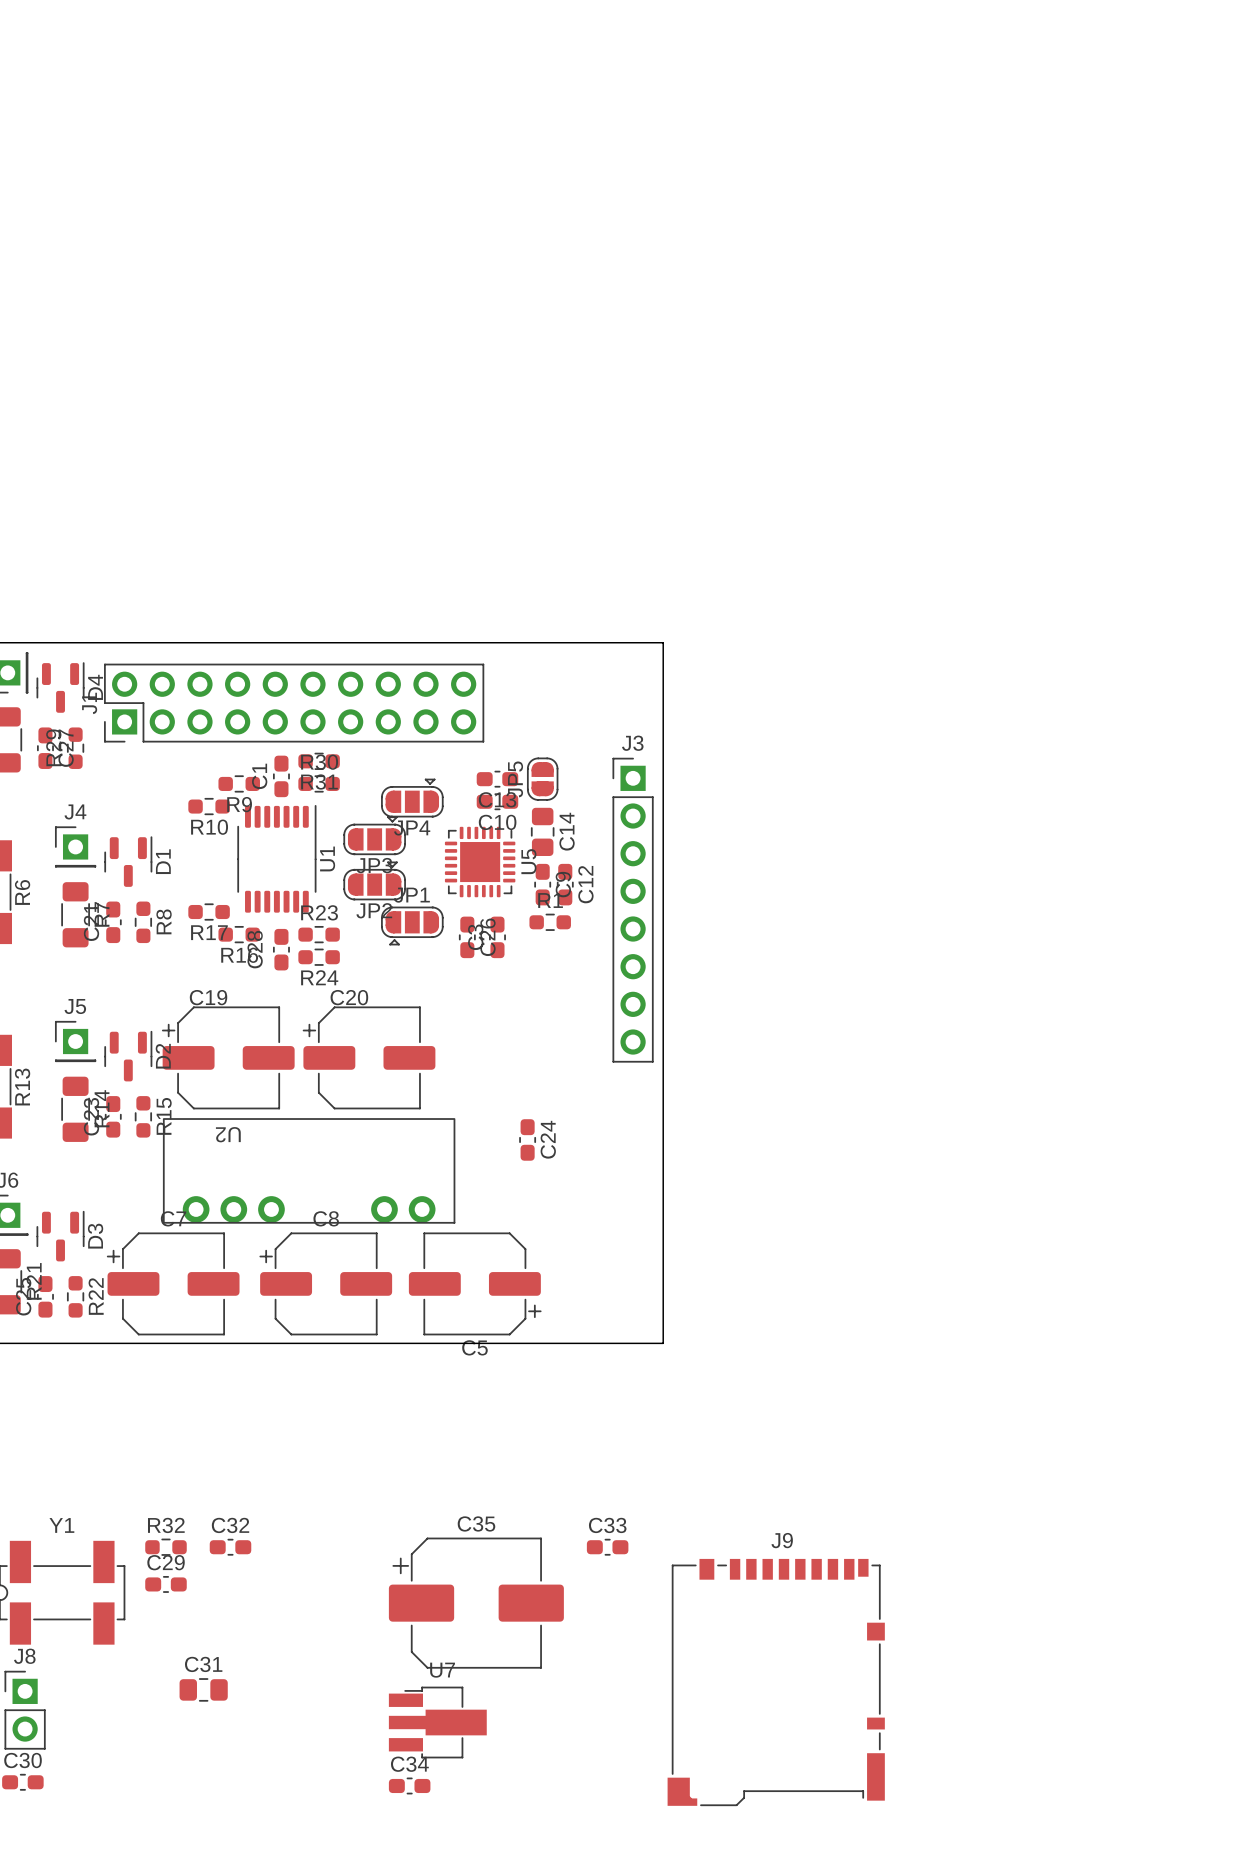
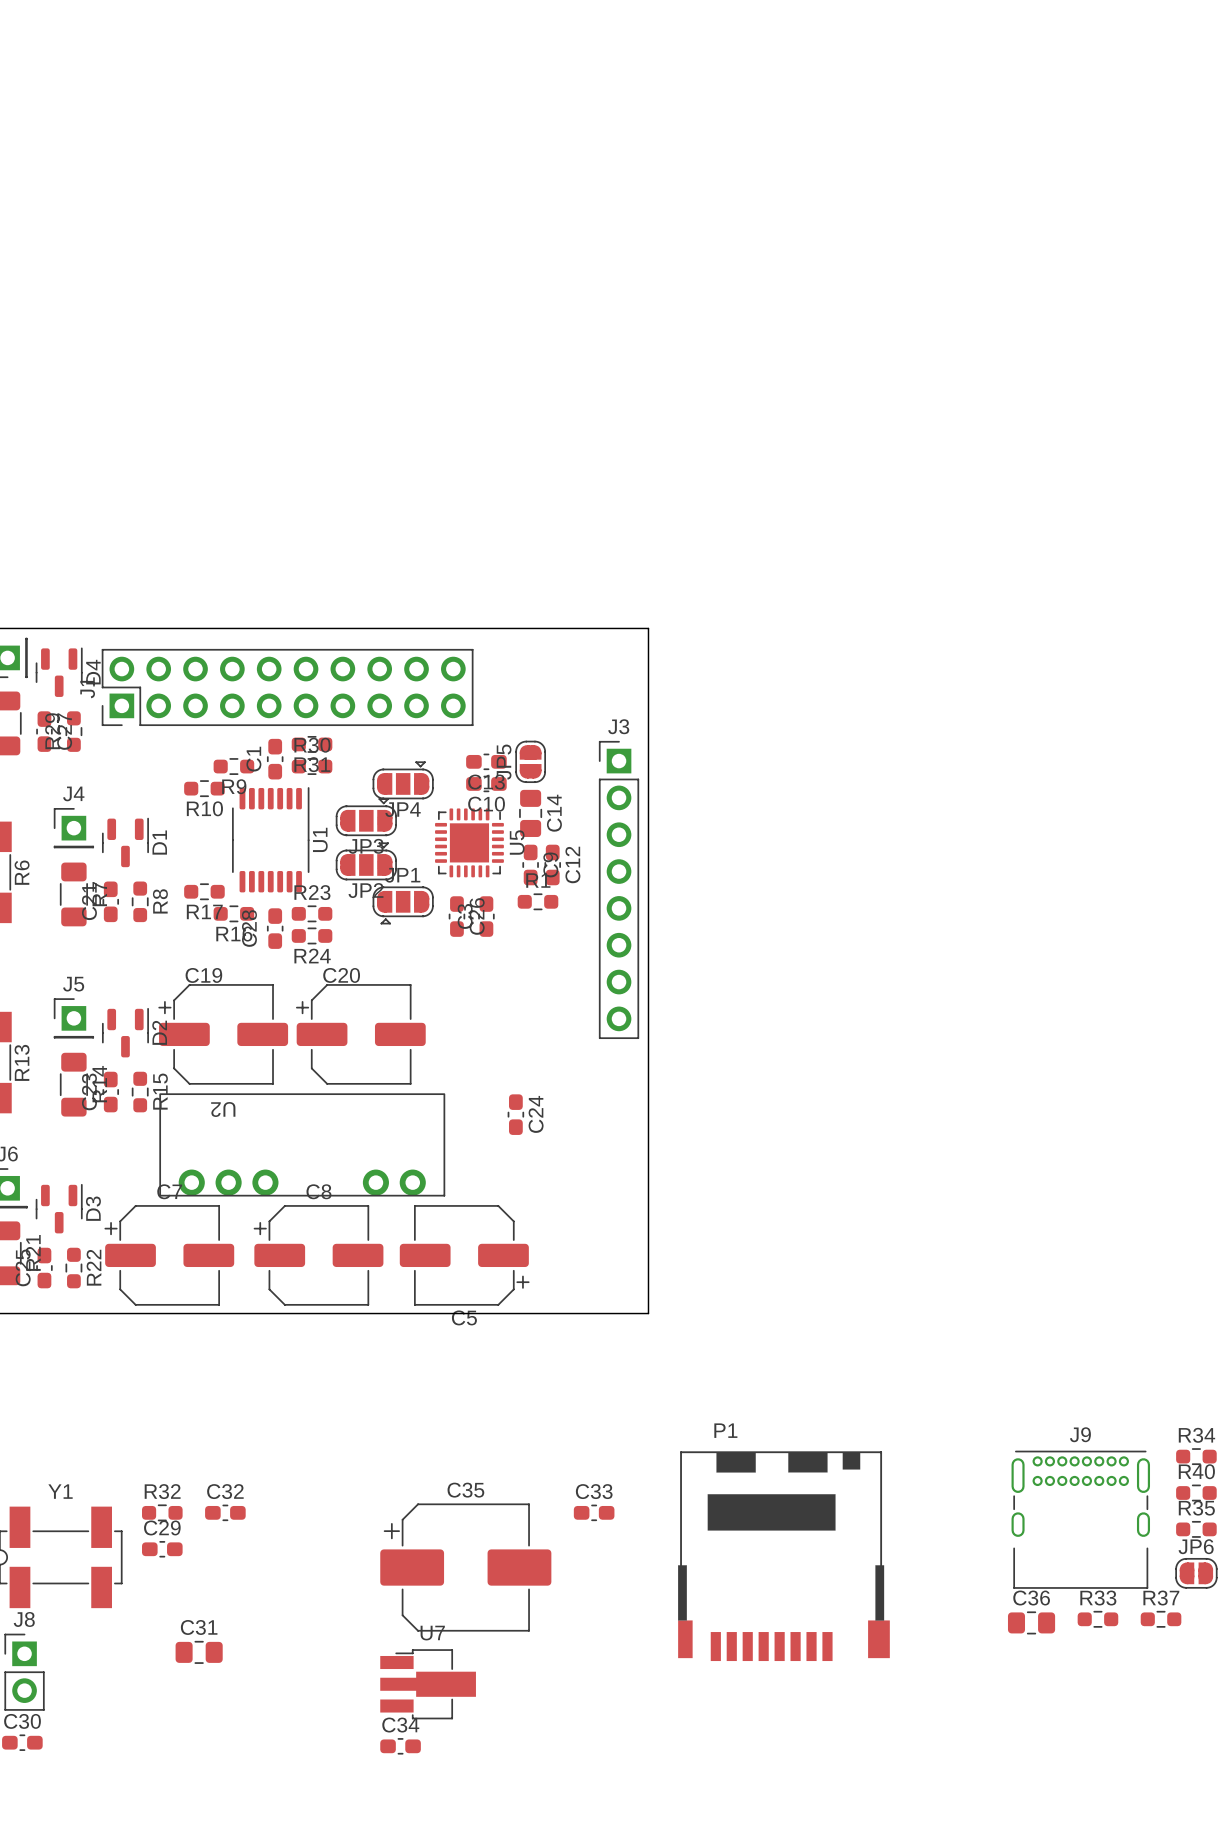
R34: none -> (1196, 1456)
R40: none -> (1196, 1493)
J9 name position: J9 (782, 1540) -> J9 (1080, 1434)
J9 footprint: [667, 1558, 885, 1807] -> [1011, 1450, 1151, 1589]
R35: none -> (1196, 1529)
P1: none -> (783, 1556)
JP6: none -> (1196, 1573)
R33: none -> (1097, 1619)
R37: none -> (1161, 1619)
C36: none -> (1031, 1622)

